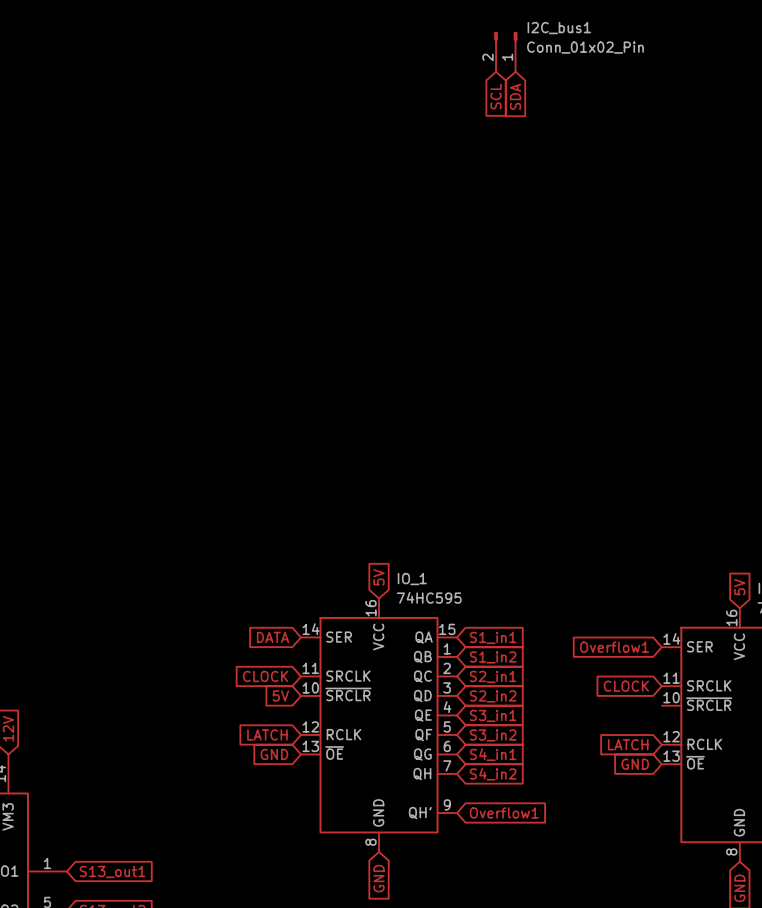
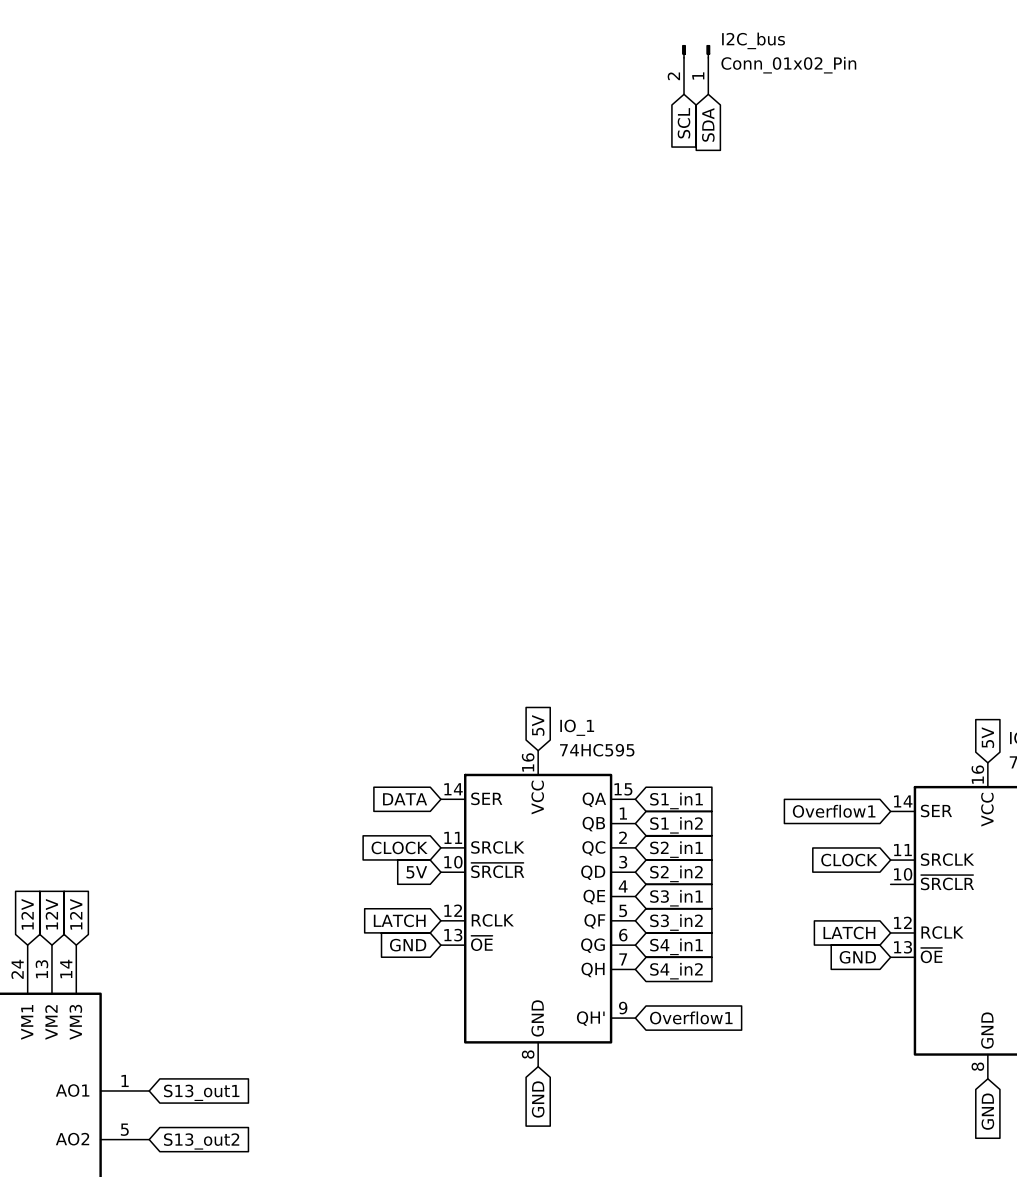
I2C_bus1 name: I2C_bus1 (559, 28) -> I2C_bus (753, 40)

